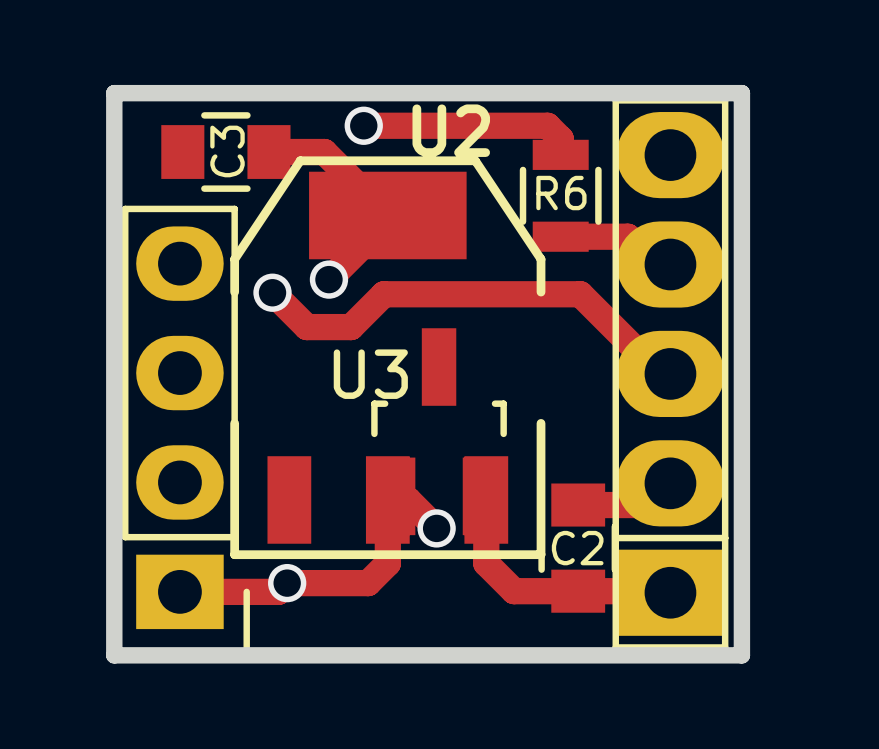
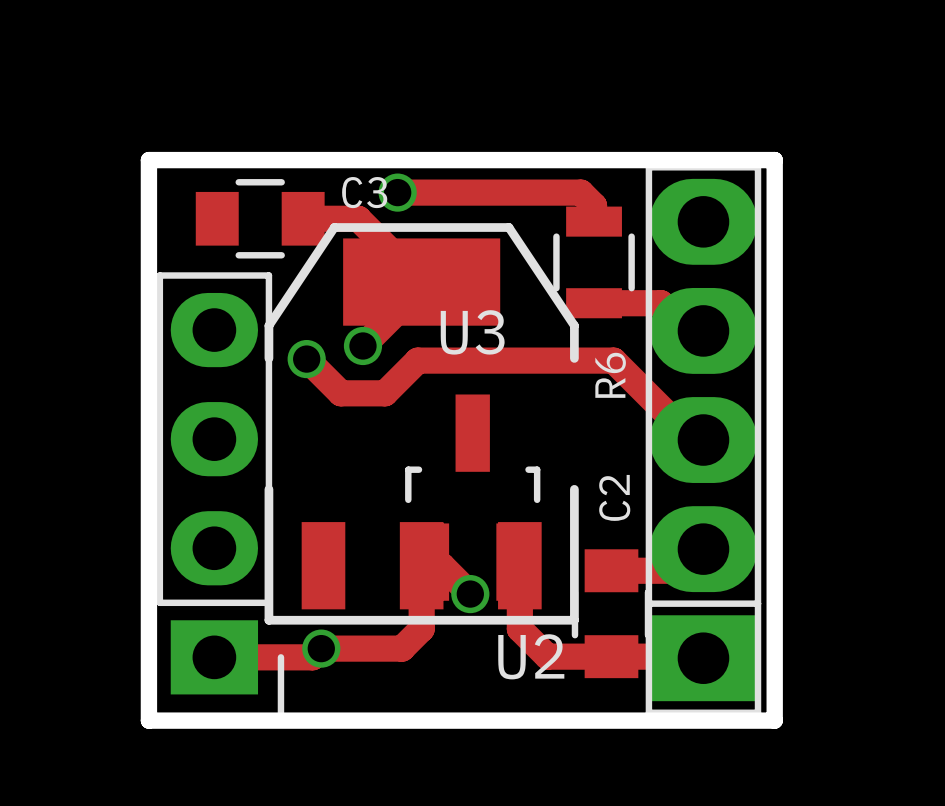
U2 name position: U2 (451, 130) -> U2 (531, 656)
C3 name rotation: 0° (227, 151) -> 90° clockwise (364, 192)
C3 name position: C3 (227, 151) -> C3 (364, 192)
R6 name rotation: 0° (561, 193) -> 90° counterclockwise (610, 375)
R6 name position: R6 (561, 193) -> R6 (610, 375)
U3 name position: U3 (370, 374) -> U3 (472, 332)
C2 name rotation: 0° (577, 548) -> 90° counterclockwise (614, 497)
C2 name position: C2 (577, 548) -> C2 (614, 497)

